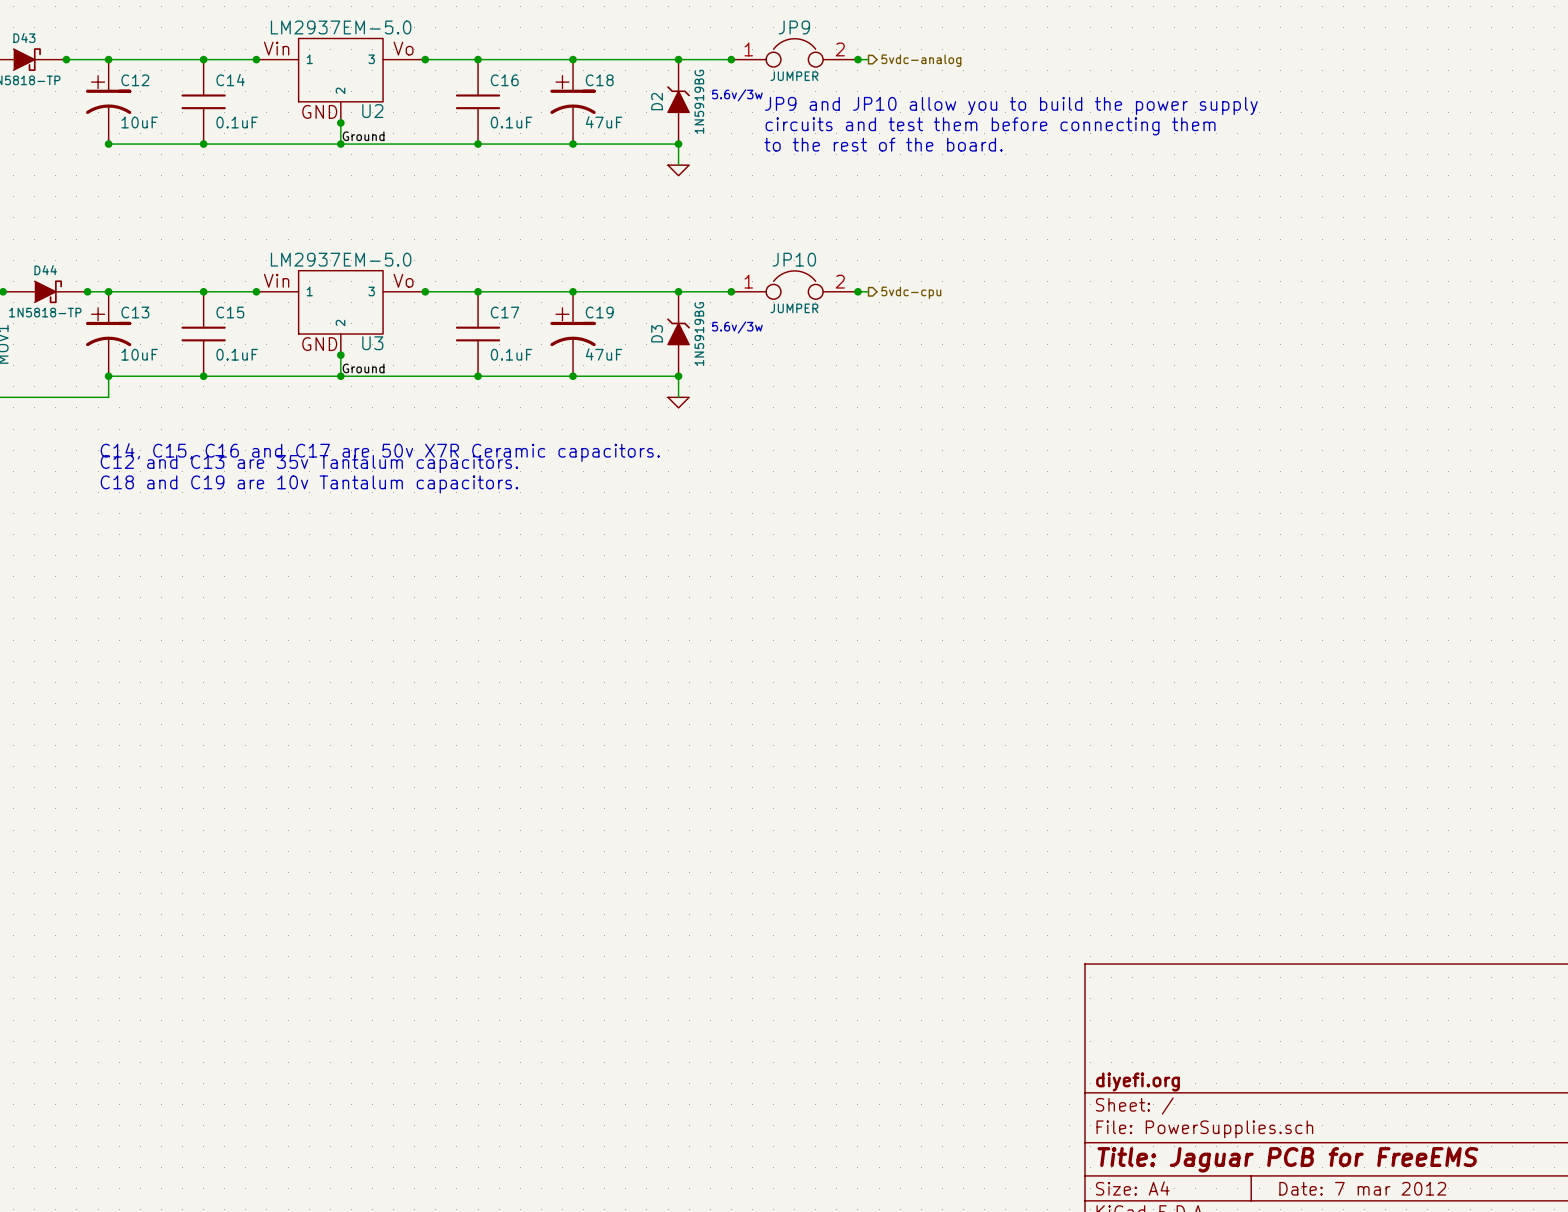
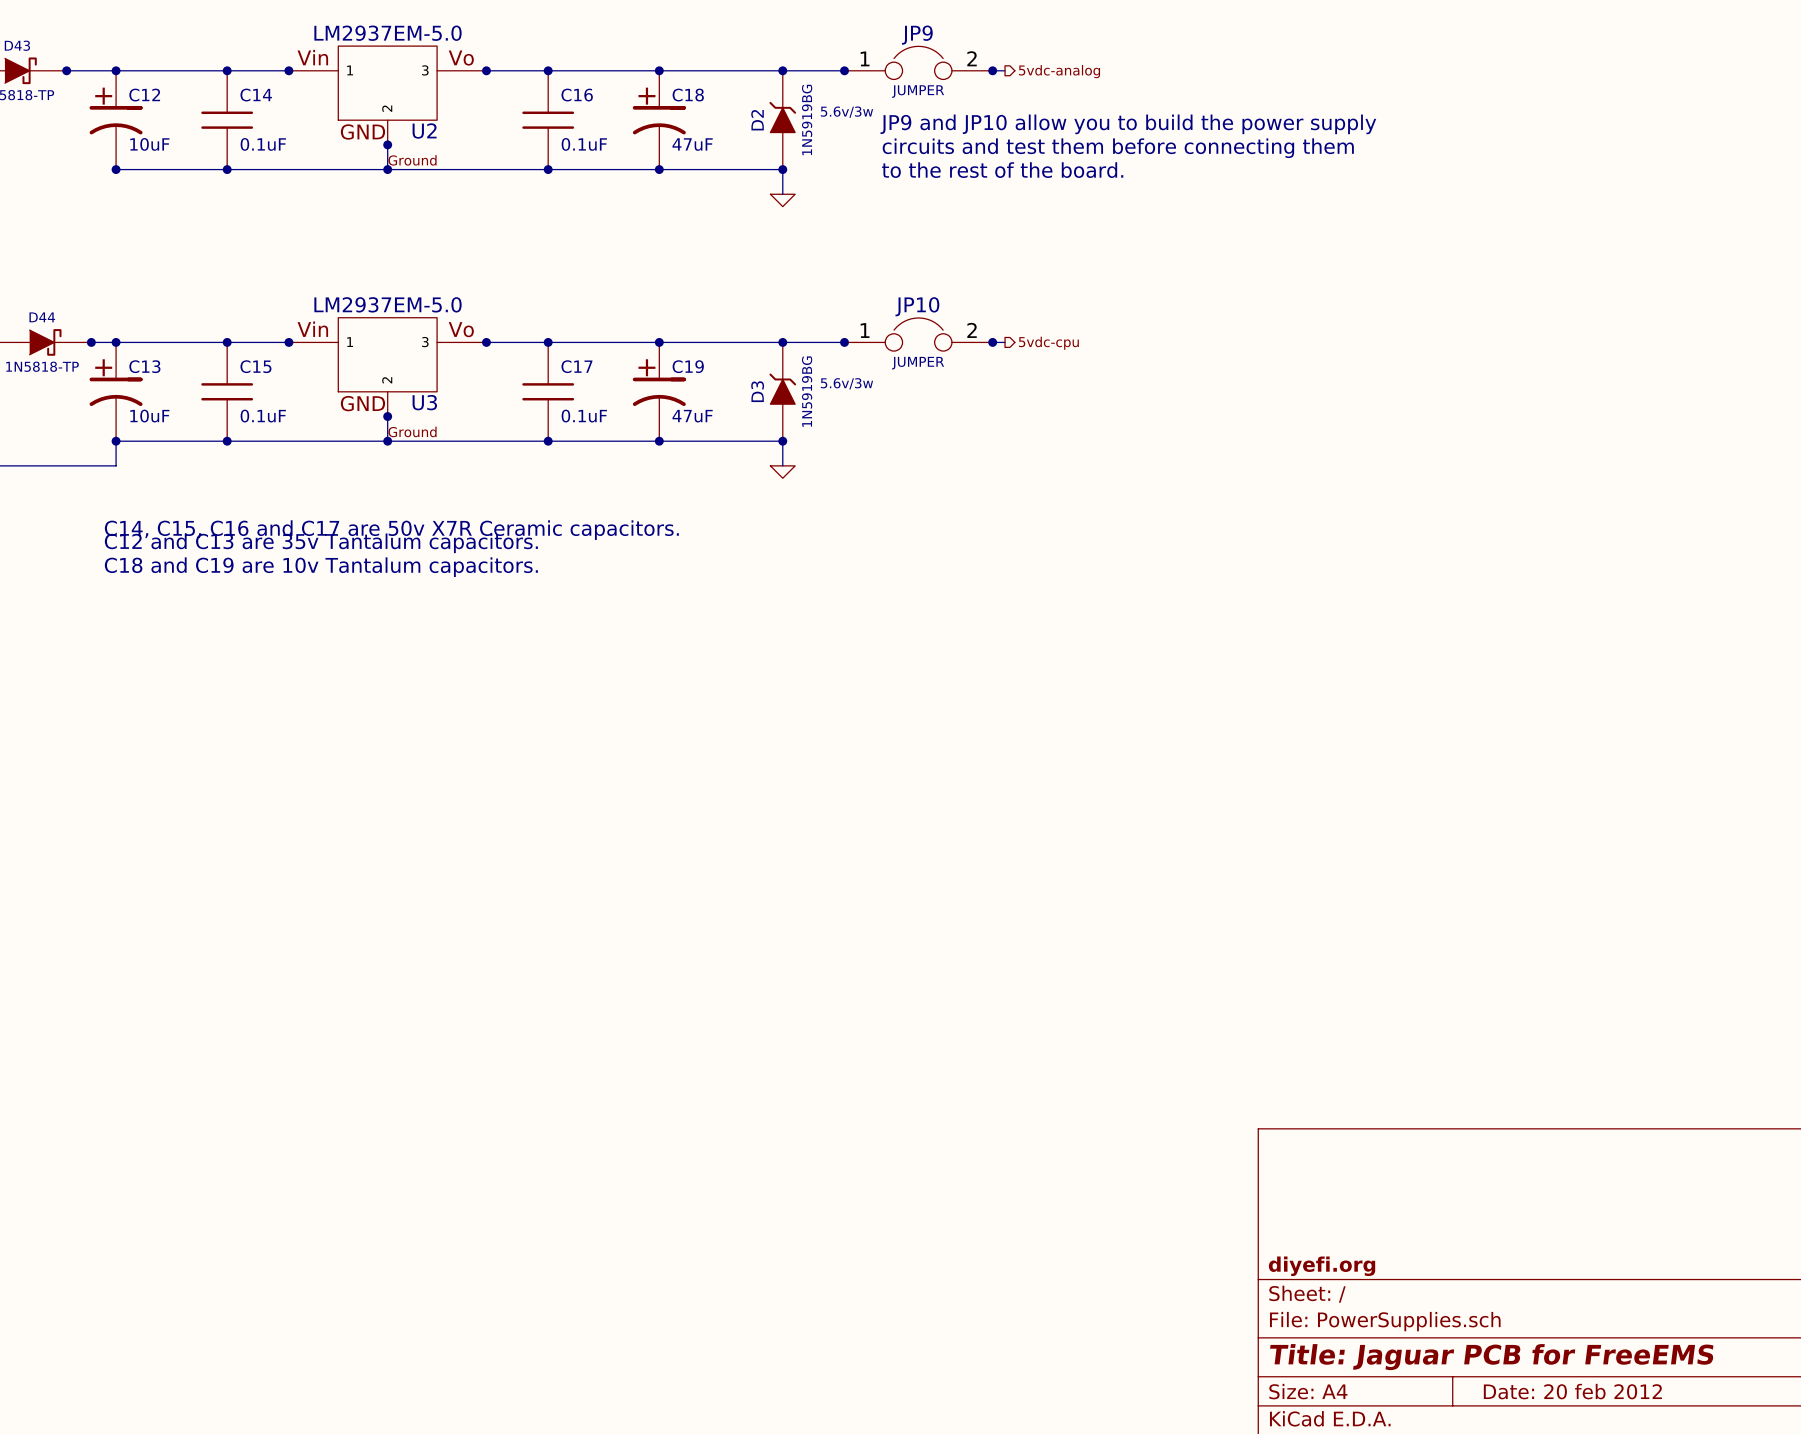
title block: Date: 7 mar 2012 (1362, 1188) -> Date: 20 feb 2012 (1572, 1391)

